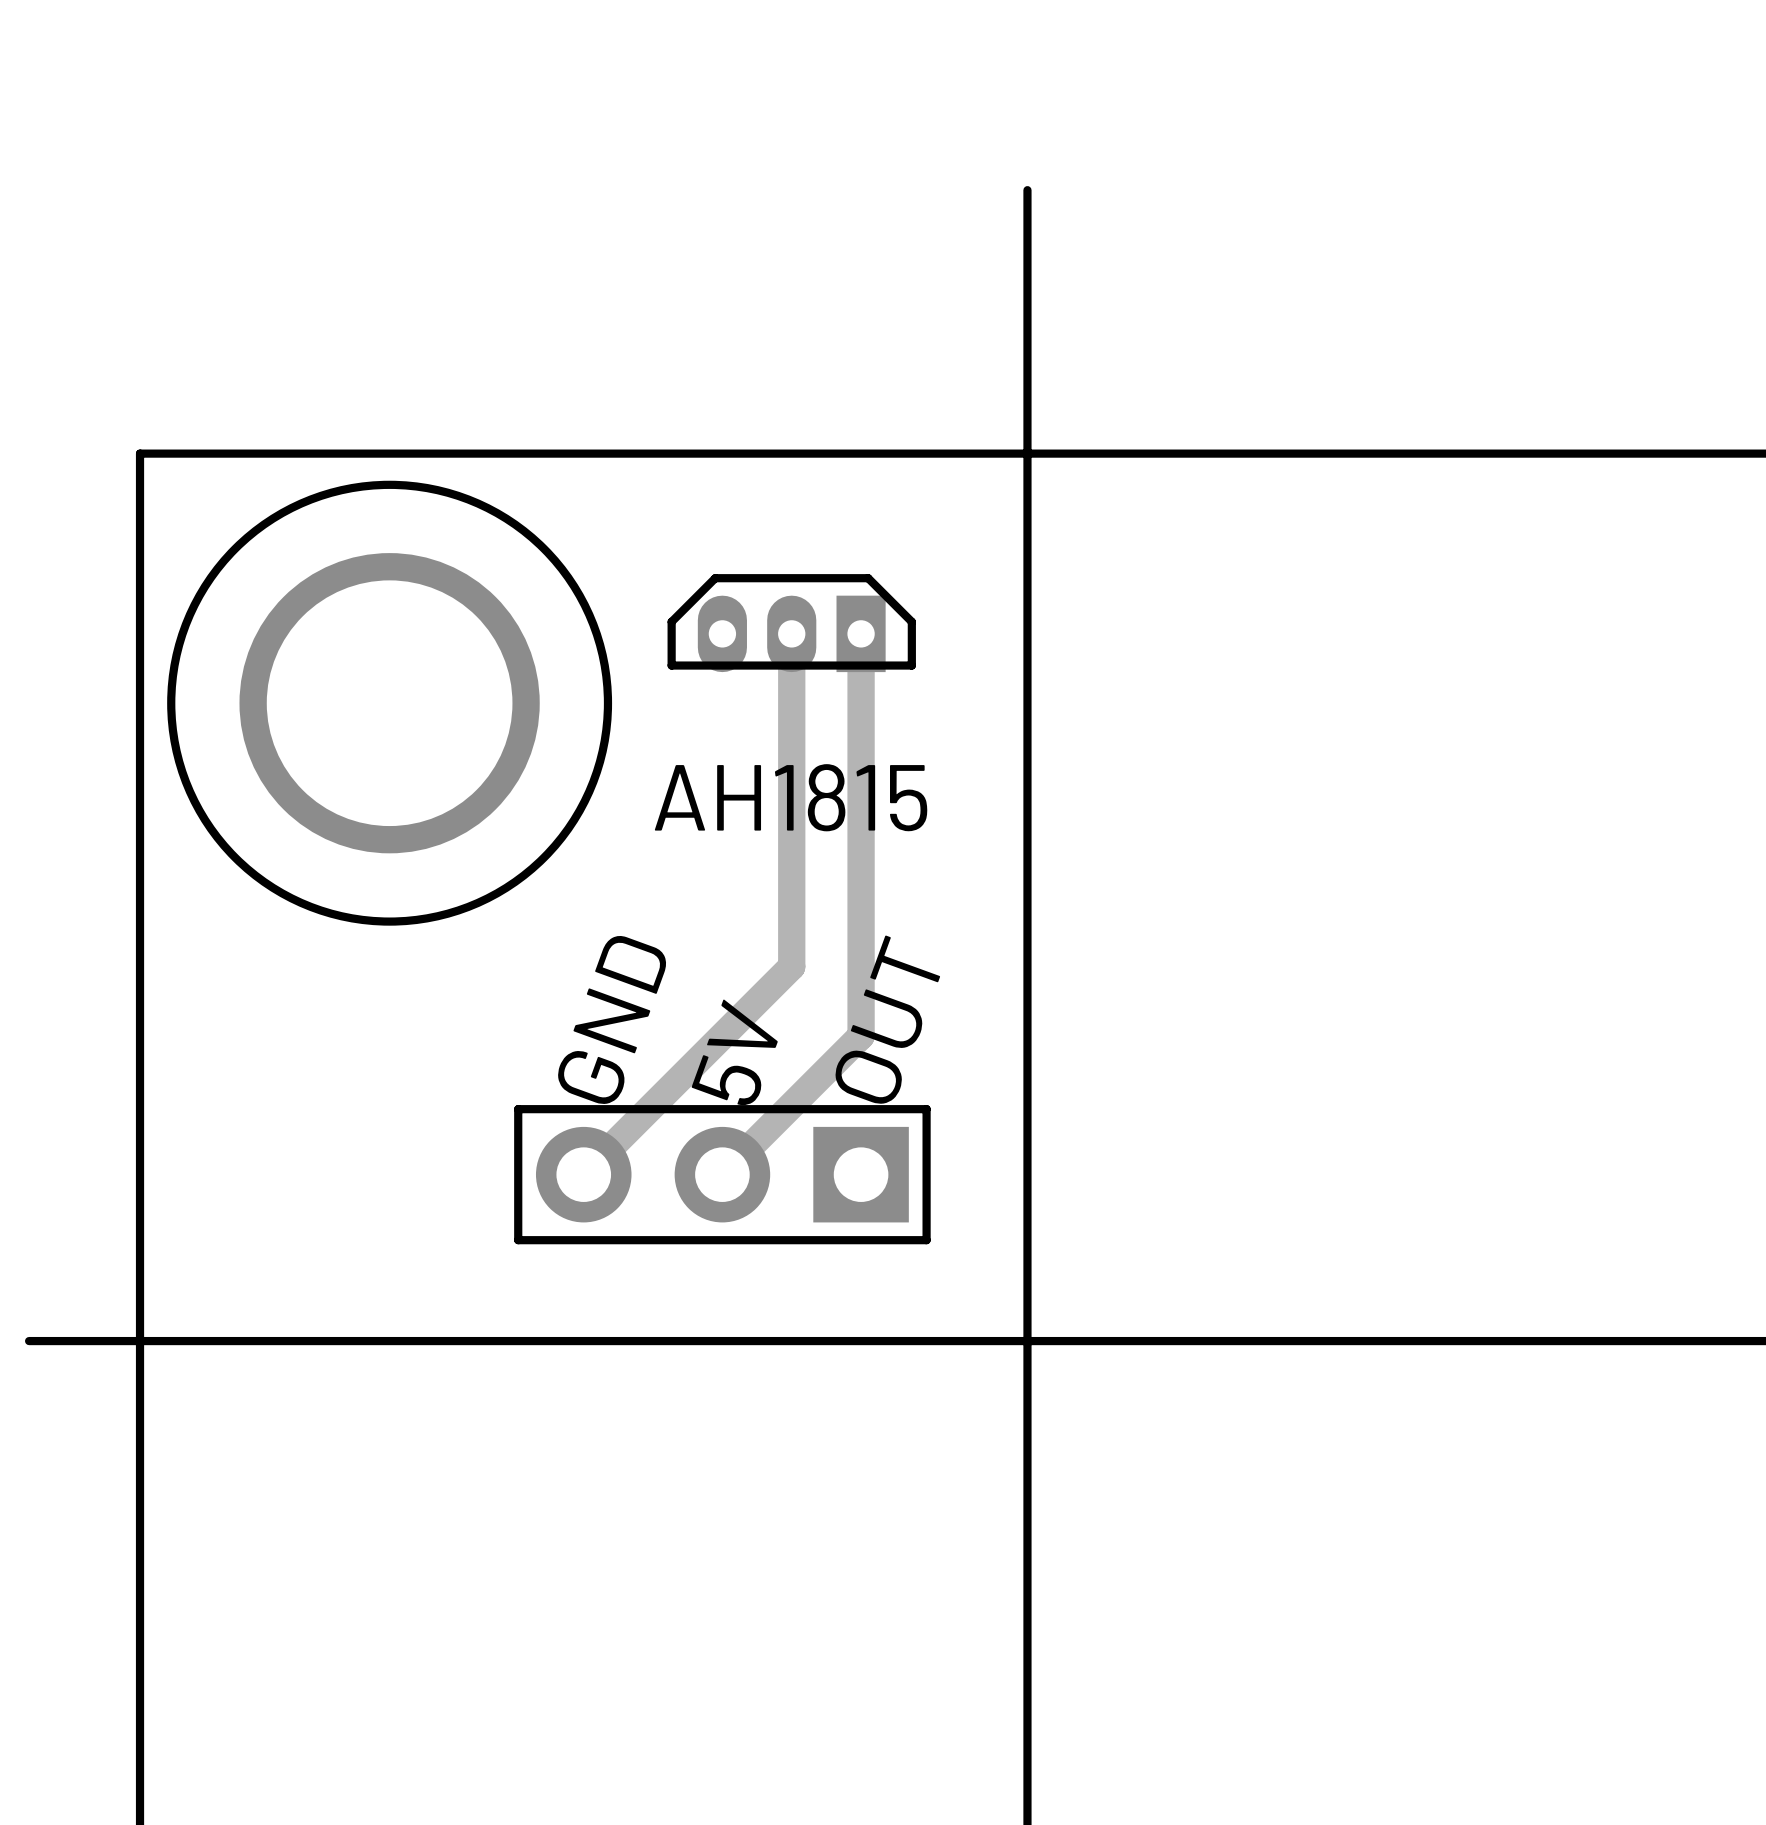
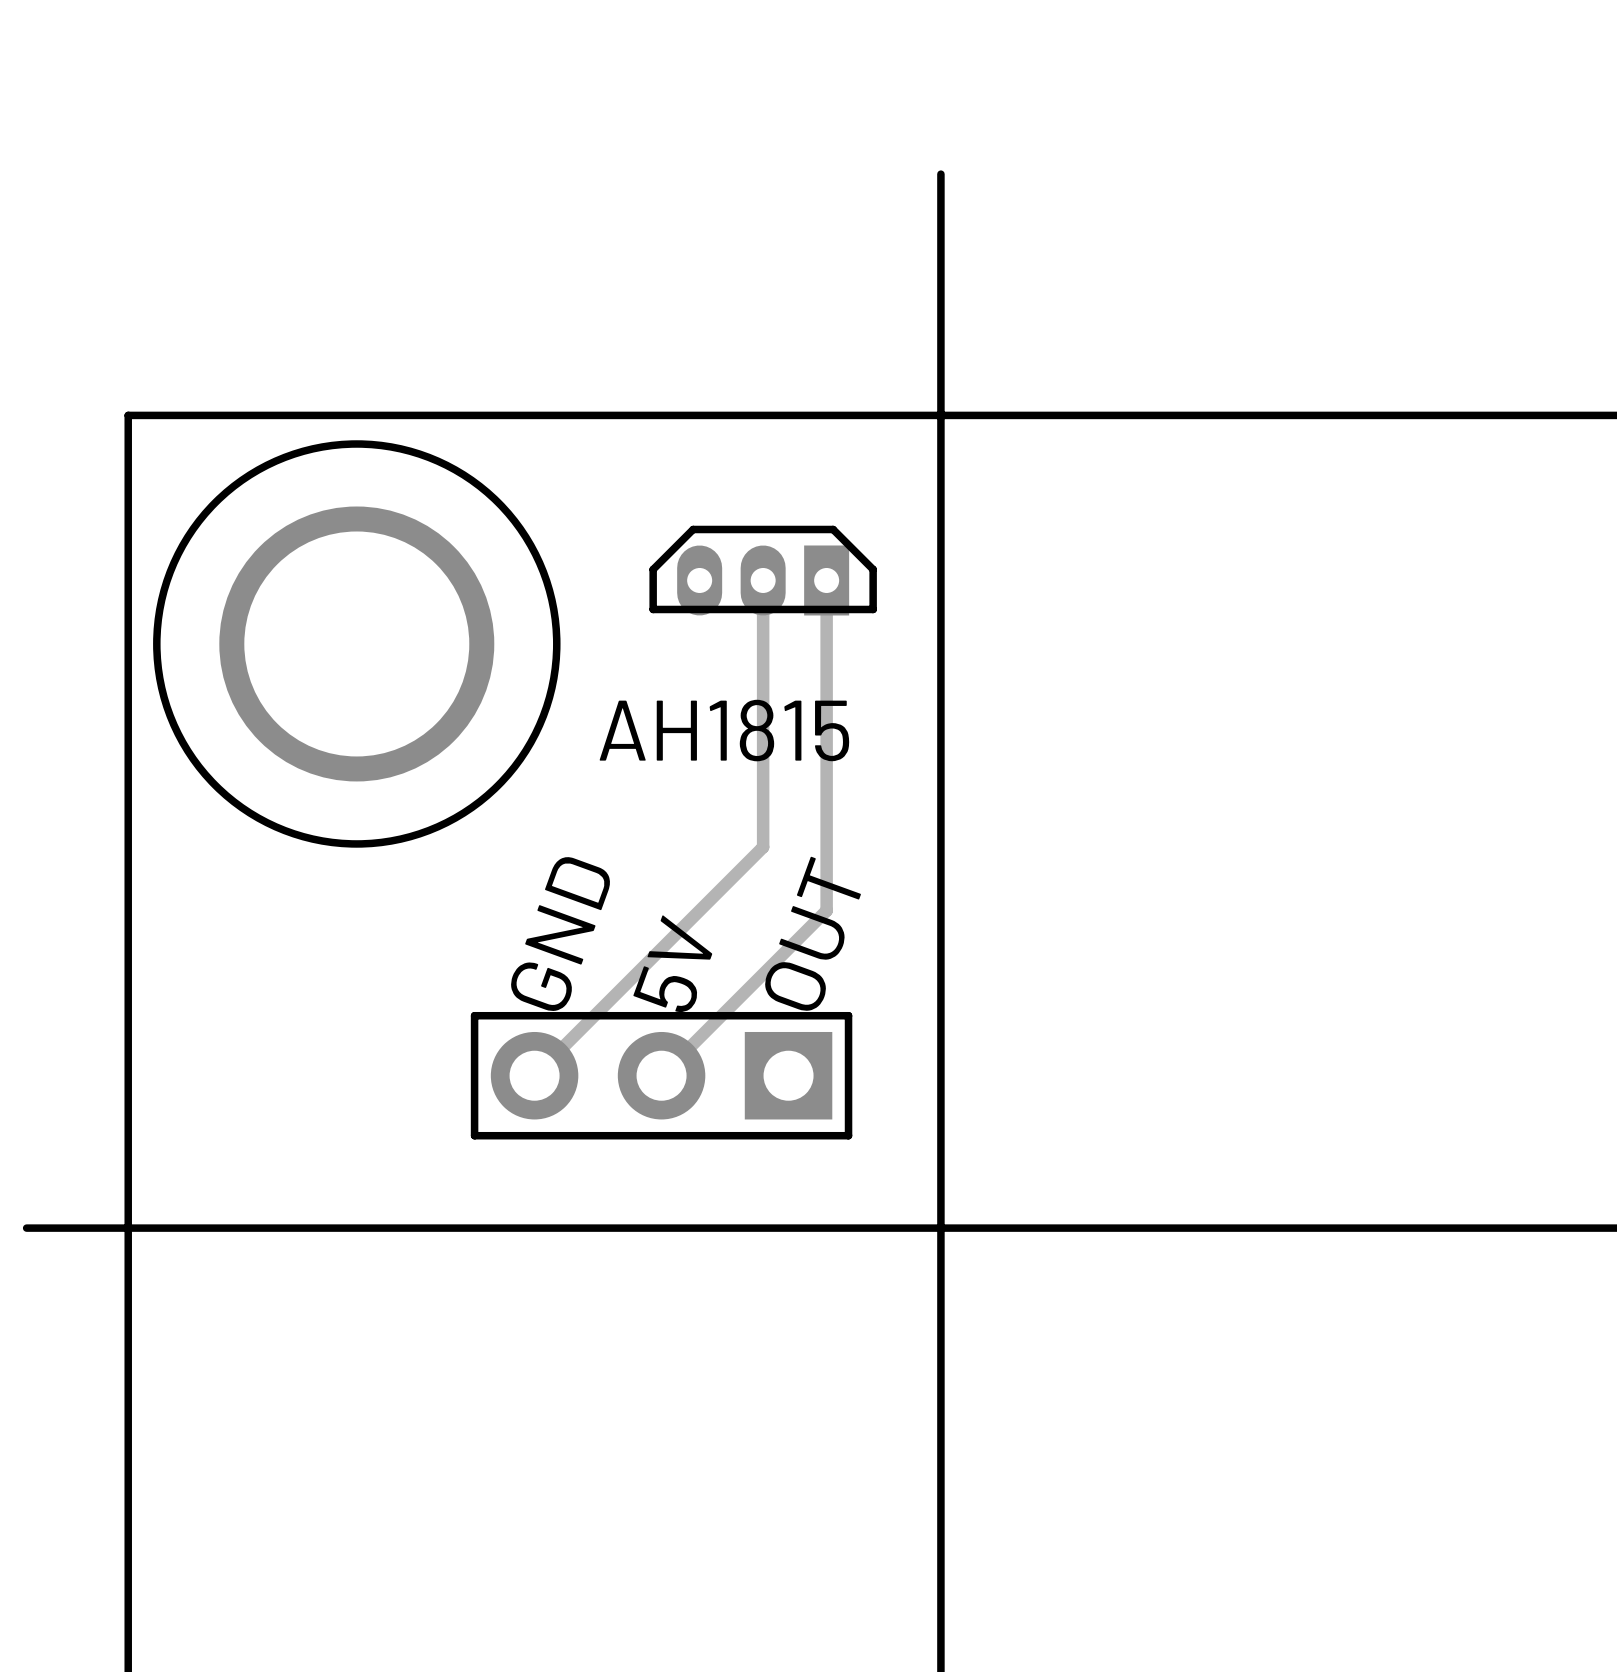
part position: (791, 623) -> (763, 570)
track: (791, 633) (791, 966) -> (763, 580) (763, 847) (725, 885)
track: (861, 633) (861, 1036) -> (826, 580) (826, 910) (788, 948)
track width: thick (791, 966) (583, 1174) -> thin (725, 885) (534, 1075)
track width: thick (861, 1036) (722, 1174) -> thin (788, 948) (661, 1075)

